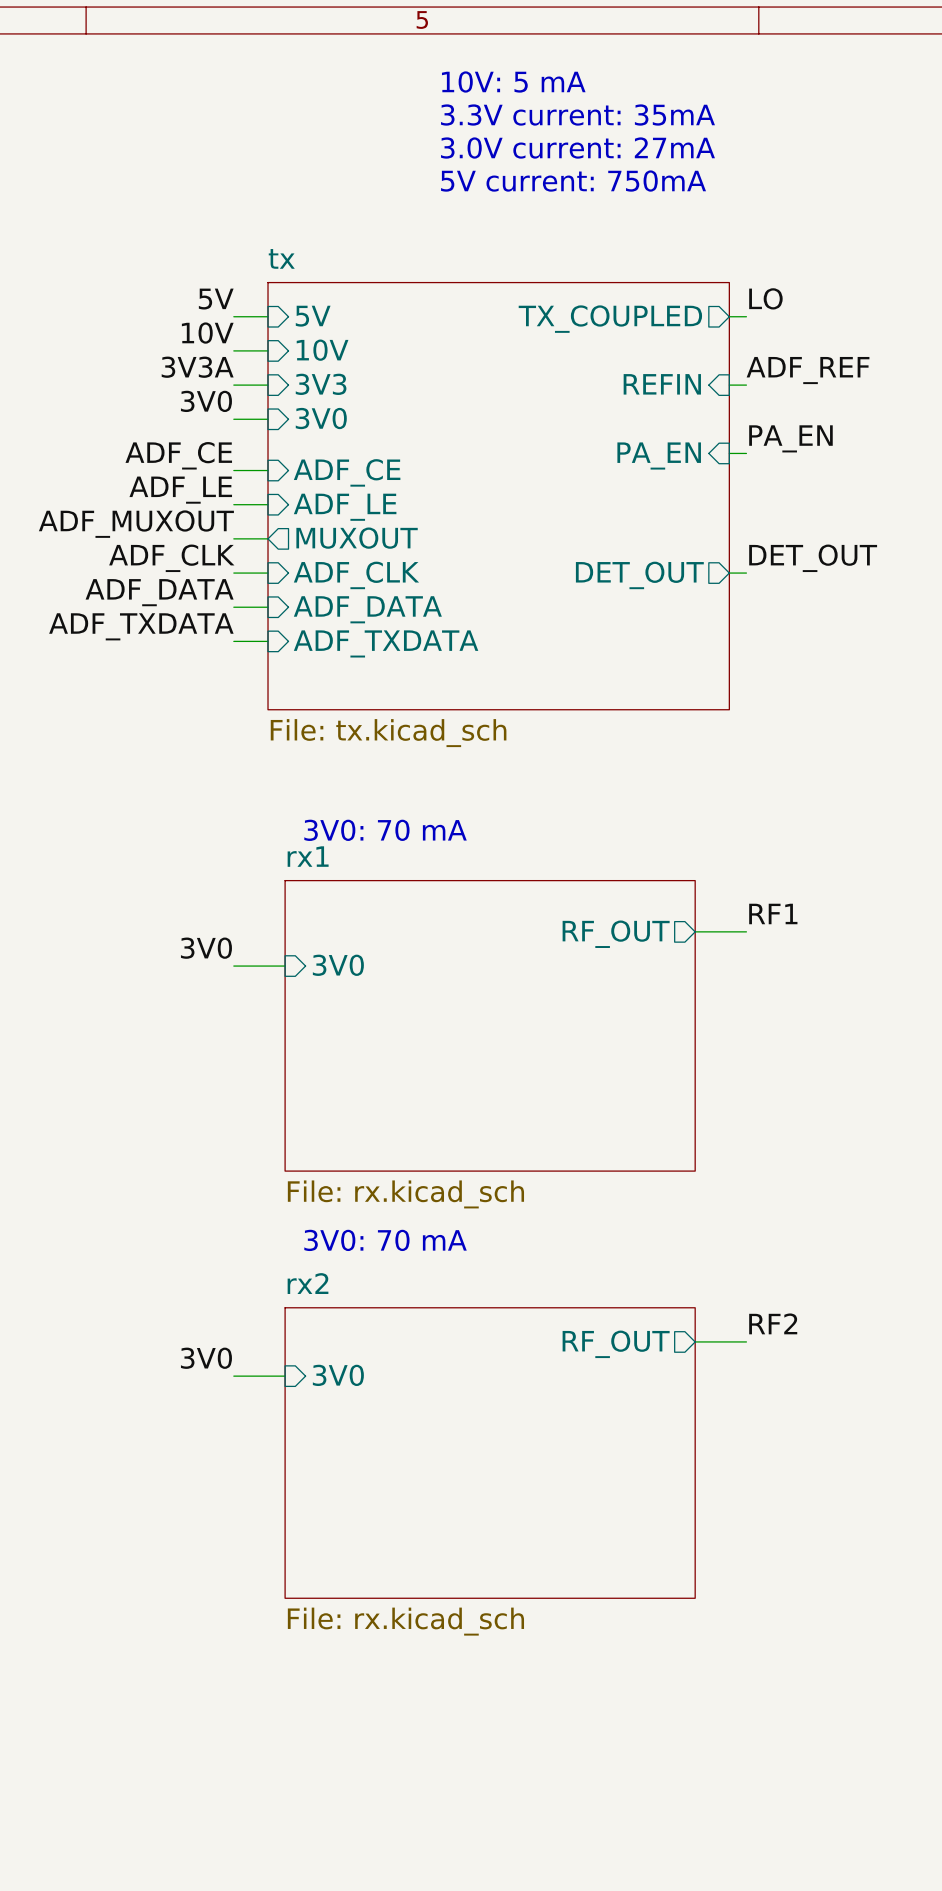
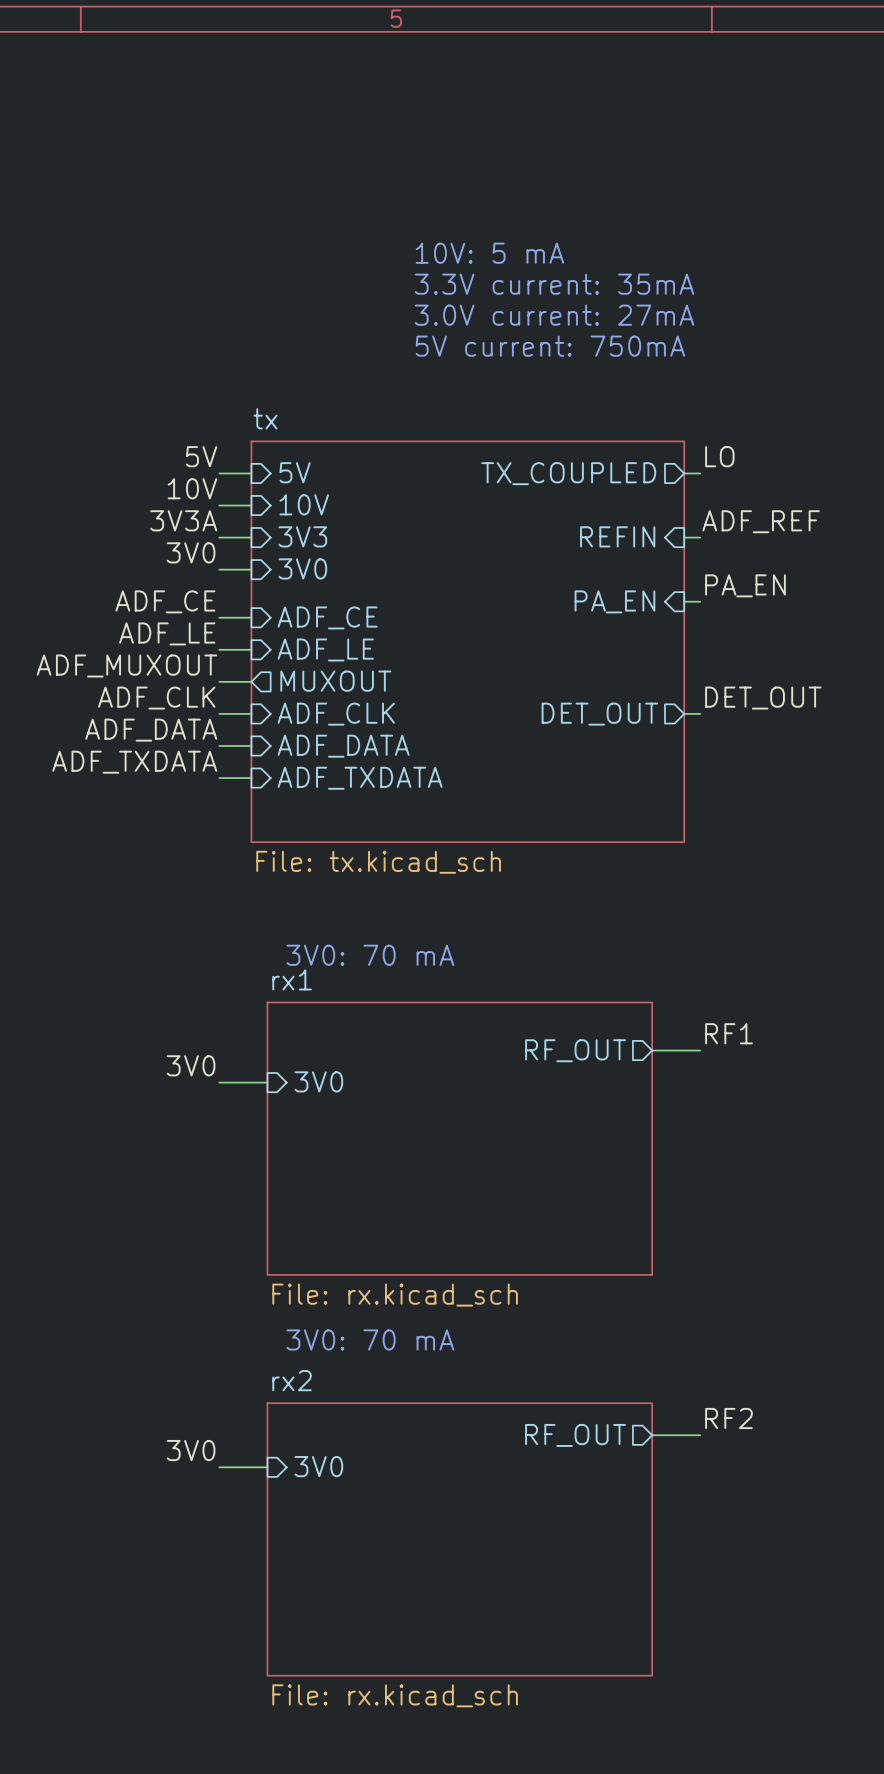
text position: 10V: 5 mA (513, 81) -> 10V: 5 mA (489, 253)
text position: 3.3V current: 35mA (577, 115) -> 3.3V current: 35mA (554, 284)
text position: 3.0V current: 27mA (577, 148) -> 3.0V current: 27mA (554, 315)
text position: 5V current: 750mA (573, 181) -> 5V current: 750mA (550, 346)
label position: LO (765, 298) -> LO (719, 456)
label: 5V (216, 299) -> none
wire: (233, 316) (268, 316) -> none
sheet pin: 5V (313, 316) -> none
wire: (729, 316) (746, 316) -> (684, 473) (700, 473)
sheet pin position: TX_COUPLED (610, 319) -> TX_COUPLED (568, 473)
label: 10V (207, 333) -> none
wire: (233, 350) (268, 350) -> none
sheet pin: 10V (322, 350) -> none
label: 3V3A (197, 367) -> none
label: ADF_REF (808, 370) -> none
sheet pin: 3V3 (321, 384) -> none
sheet pin: REFIN (662, 384) -> none
wire: (233, 385) (268, 385) -> (219, 649) (251, 649)
wire: (729, 385) (746, 385) -> none
label: 3V0 (206, 401) -> none
sheet pin: 3V0 (321, 418) -> none
wire: (233, 419) (268, 419) -> (219, 681) (251, 681)
label position: PA_EN (790, 438) -> PA_EN (745, 585)
wire: (729, 453) (746, 453) -> (684, 601) (700, 601)
label position: ADF_CE (178, 455) -> ADF_CE (165, 601)
sheet pin position: PA_EN (659, 455) -> PA_EN (614, 601)
wire: (233, 470) (268, 470) -> (219, 617) (251, 617)
sheet pin position: ADF_CE (347, 472) -> ADF_CE (327, 617)
label: ADF_LE (180, 490) -> 5V (201, 456)
sheet tx position: (498, 496) -> (467, 641)
sheet pin: ADF_LE (345, 507) -> 5V (295, 472)
label: ADF_MUXOUT (136, 524) -> 10V (192, 488)
sheet pin shape: output (357, 538) -> input (304, 504)
sheet pin: MUXOUT (357, 538) -> 10V (304, 504)
label: ADF_CLK (171, 558) -> 3V3A (183, 520)
label: DET_OUT (813, 558) -> ADF_REF (761, 521)
sheet pin: ADF_CLK (356, 575) -> 3V3 (302, 536)
sheet pin shape: output (639, 575) -> input (617, 536)
sheet pin: DET_OUT (639, 575) -> REFIN (617, 536)
label: ADF_DATA (159, 592) -> 3V0 (191, 552)
sheet pin: ADF_DATA (367, 609) -> 3V0 (302, 568)
label position: ADF_TXDATA (141, 626) -> ADF_TXDATA (134, 762)
wire: (233, 641) (268, 641) -> (219, 778) (251, 778)
sheet pin position: ADF_TXDATA (386, 643) -> ADF_TXDATA (360, 778)
label: none -> ADF_LE (167, 633)
sheet pin: none -> ADF_LE (325, 650)
label: none -> ADF_MUXOUT (126, 666)
sheet pin: none -> MUXOUT (335, 681)
label: none -> ADF_CLK (156, 698)
label: none -> DET_OUT (763, 698)
wire: none -> (219, 713) (251, 713)
wire: none -> (684, 713) (700, 713)
sheet pin: none -> ADF_CLK (336, 714)
sheet pin: none -> DET_OUT (599, 714)
label: none -> ADF_DATA (151, 730)
wire: none -> (219, 745) (251, 745)
sheet pin: none -> ADF_DATA (343, 746)
text: 3V0: 70 mA (385, 830) -> none
label position: RF1 (773, 913) -> RF1 (729, 1033)
wire: (695, 931) (746, 931) -> (652, 1050) (700, 1050)
sheet pin: RF_OUT (616, 934) -> none
label: 3V0 (206, 948) -> none
sheet pin: 3V0 (338, 965) -> none
wire: (233, 966) (285, 966) -> (219, 1082) (267, 1082)
text: none -> 3V0: 70 mA (370, 955)
sheet rx1 position: (490, 1025) -> (459, 1138)
sheet pin: none -> RF_OUT (575, 1050)
label: none -> 3V0 (191, 1065)
sheet pin: none -> 3V0 (318, 1081)
text: 3V0: 70 mA (385, 1240) -> none
label position: RF2 (773, 1323) -> RF2 (729, 1418)
wire: (695, 1341) (746, 1341) -> (652, 1435) (700, 1435)
sheet pin: RF_OUT (616, 1344) -> none
label: 3V0 (206, 1358) -> none
sheet pin: 3V0 (338, 1375) -> none
wire: (233, 1376) (285, 1376) -> (219, 1467) (267, 1467)
text: none -> 3V0: 70 mA (370, 1339)
sheet rx2 position: (490, 1453) -> (459, 1539)
sheet pin: none -> RF_OUT (575, 1435)
label: none -> 3V0 (191, 1450)
sheet pin: none -> 3V0 (318, 1466)

